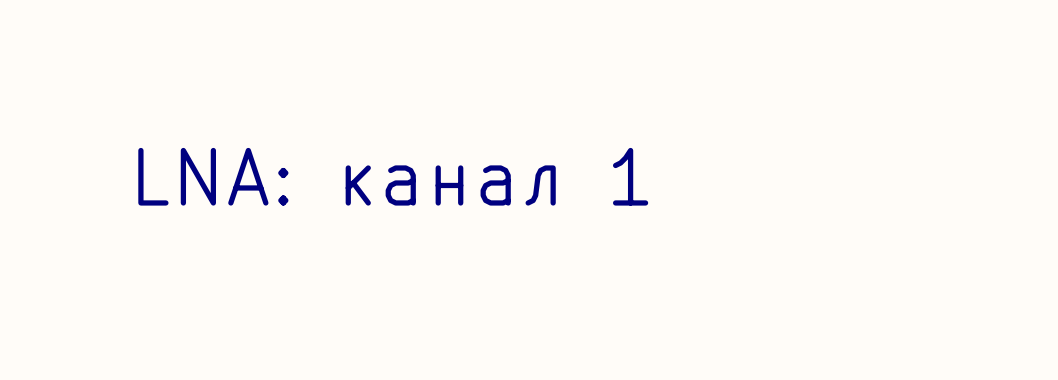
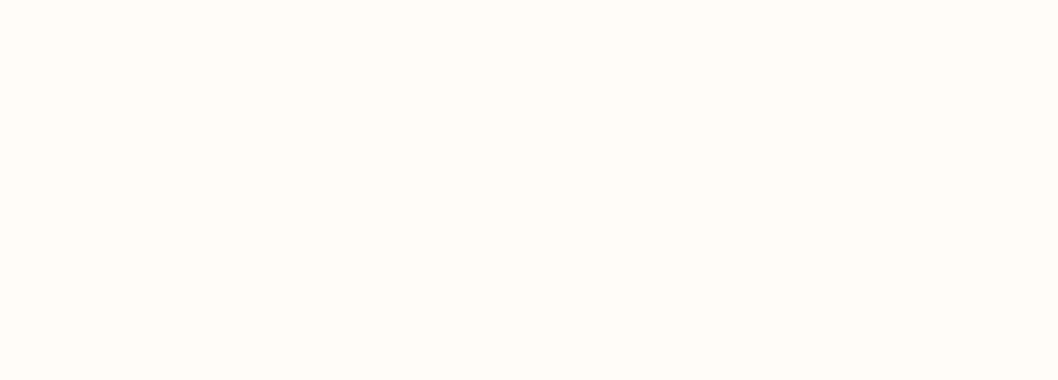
text: LNA: канал 1 (393, 176) -> none

